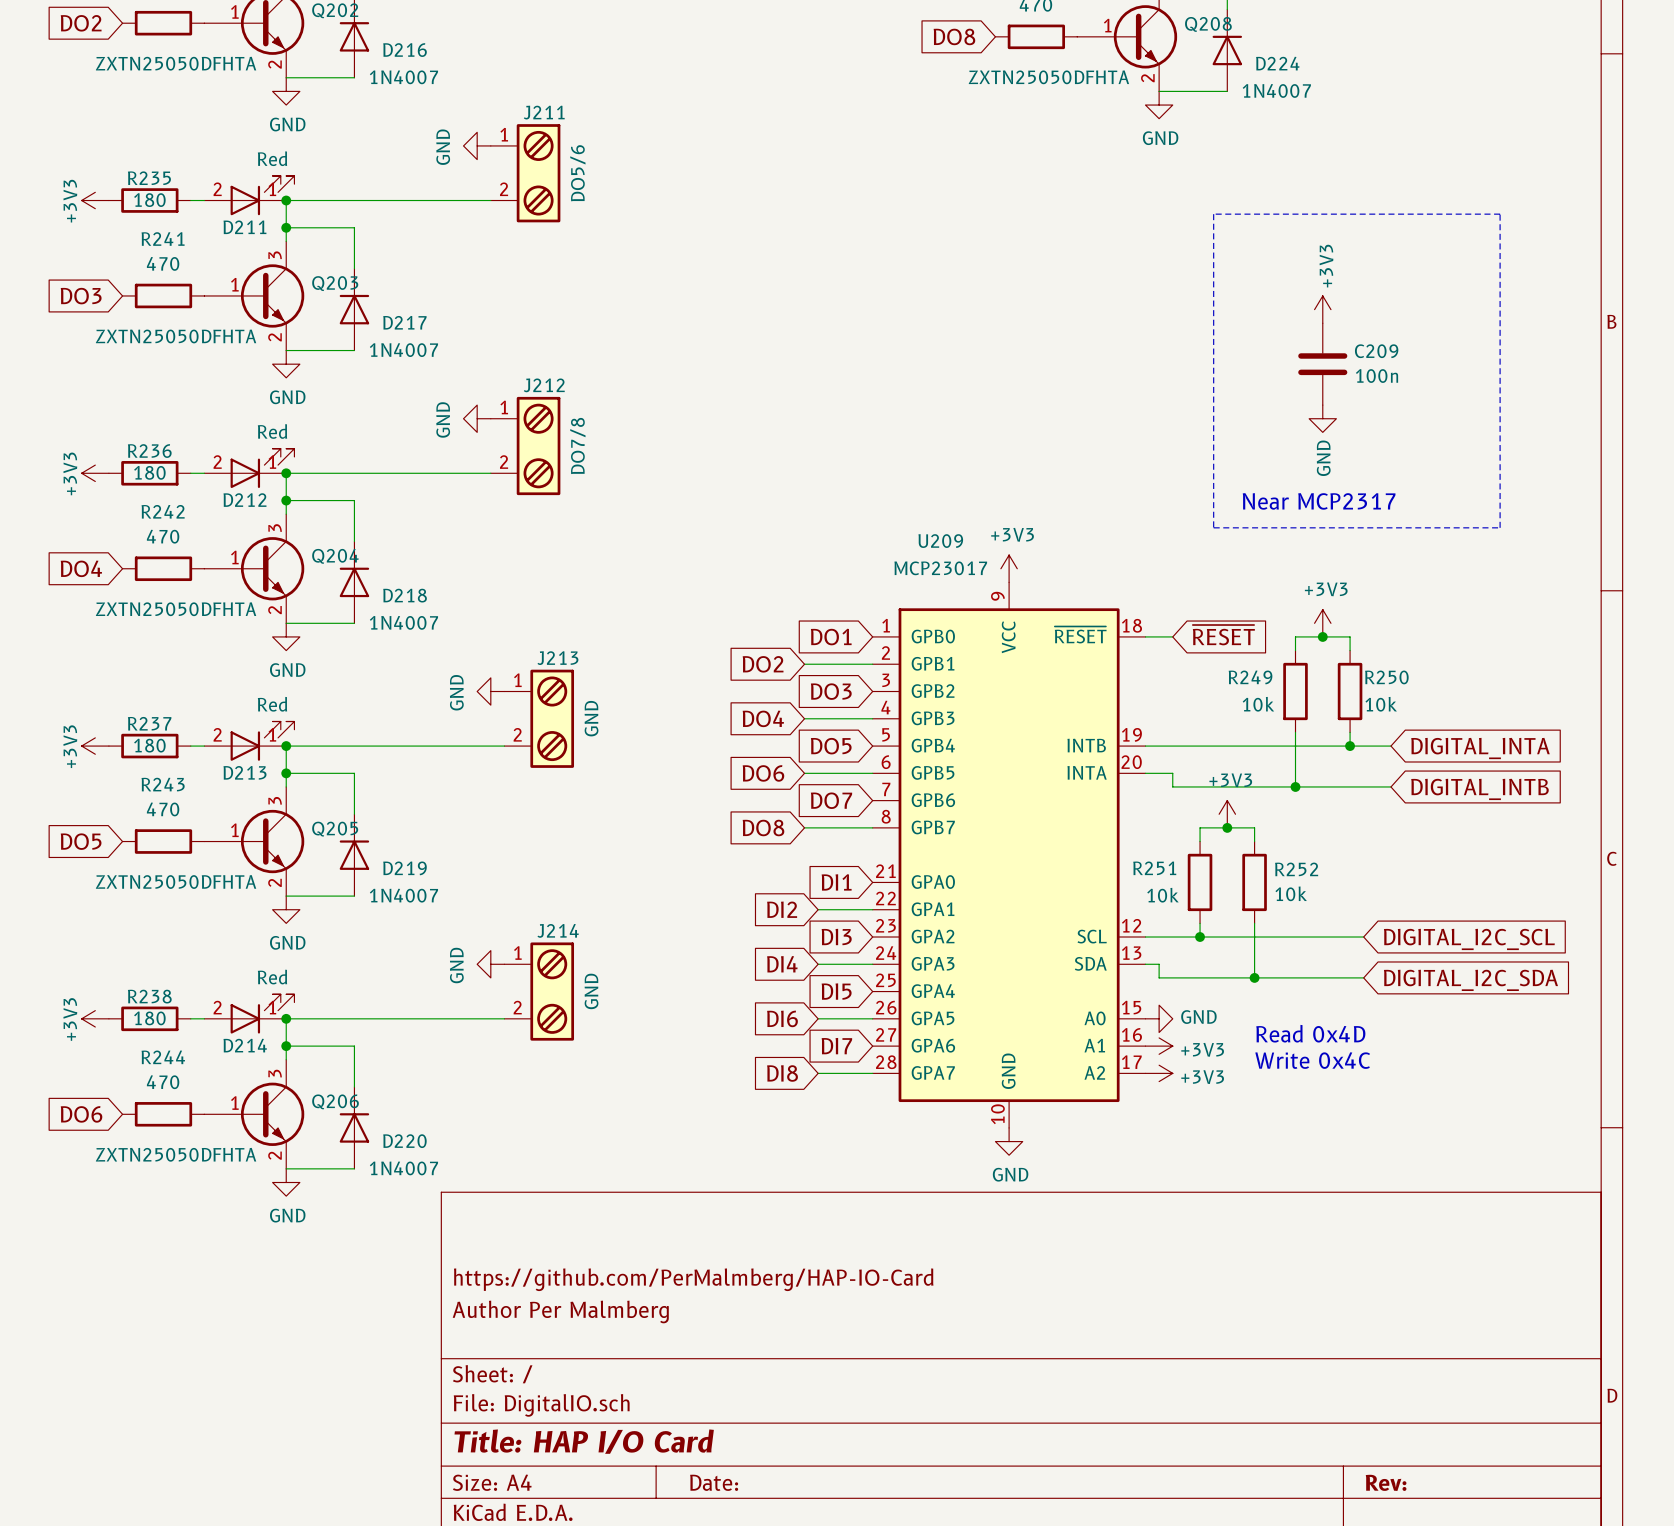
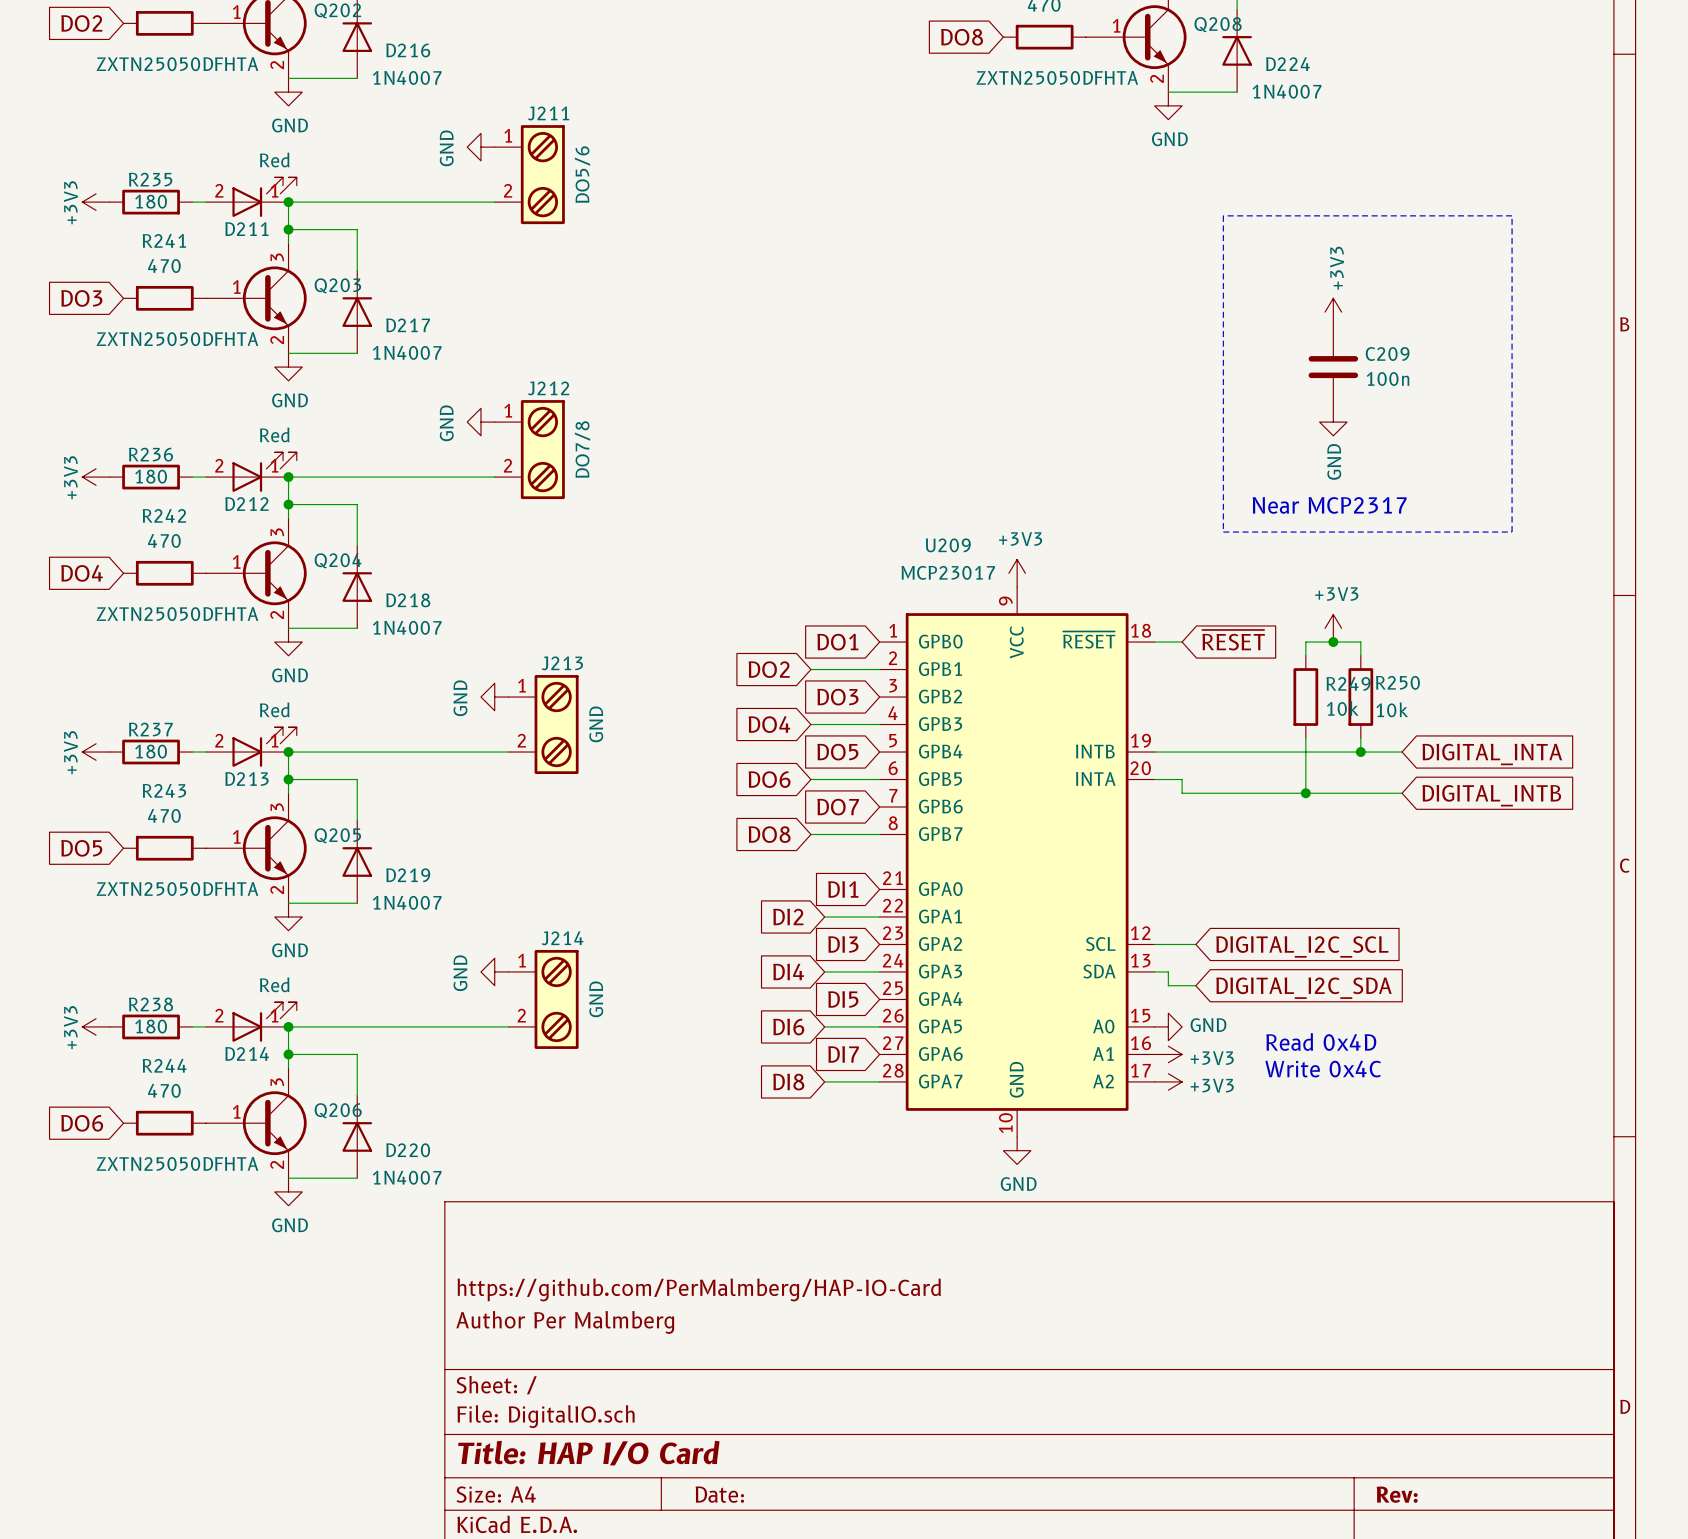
R249 name position: R249 (1250, 677) -> R249 (1348, 683)
R249 value position: 10k (1258, 704) -> 10k (1342, 708)
power symbol: +3V3 (1227, 814) -> none
junction: (1227, 827) -> none
wire: (1200, 841) (1200, 827) (1254, 827) (1254, 841) -> none
R251: 10k (1200, 882) -> none
R252: 10k (1254, 882) -> none
wire: (1200, 923) (1200, 937) -> none
wire: (1254, 923) (1254, 977) -> none
wire: (1186, 937) (1363, 937) -> none
junction: (1200, 937) -> none
global label position: DIGITAL_I2C_SCL (1469, 939) -> DIGITAL_I2C_SCL (1302, 946)
wire: (1186, 977) (1363, 977) -> none
junction: (1254, 977) -> none
global label position: DIGITAL_I2C_SDA (1470, 980) -> DIGITAL_I2C_SDA (1303, 988)

